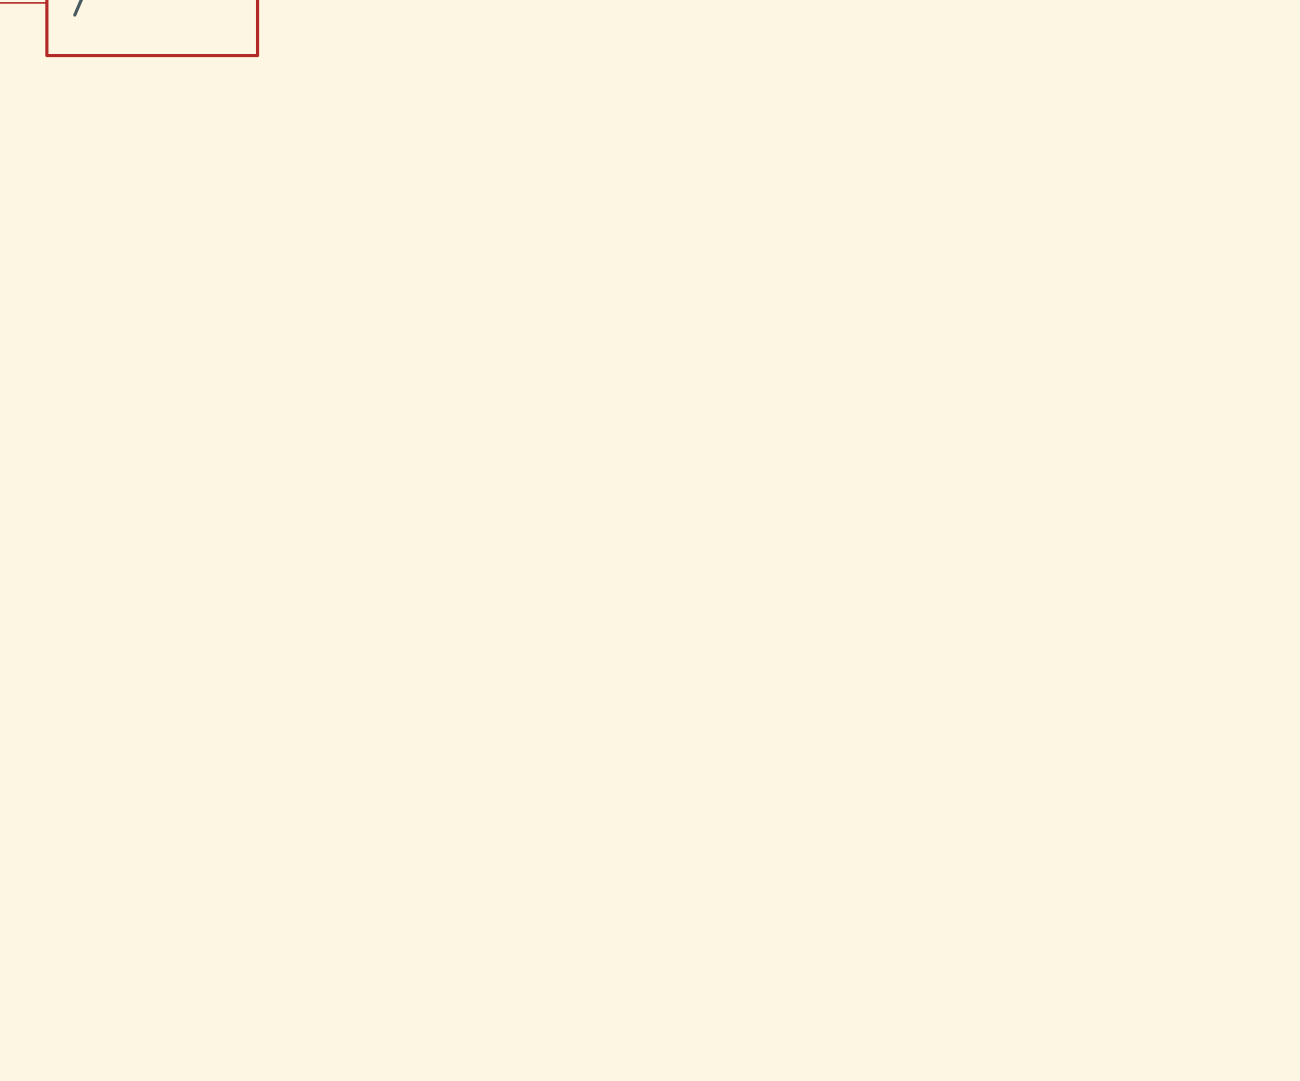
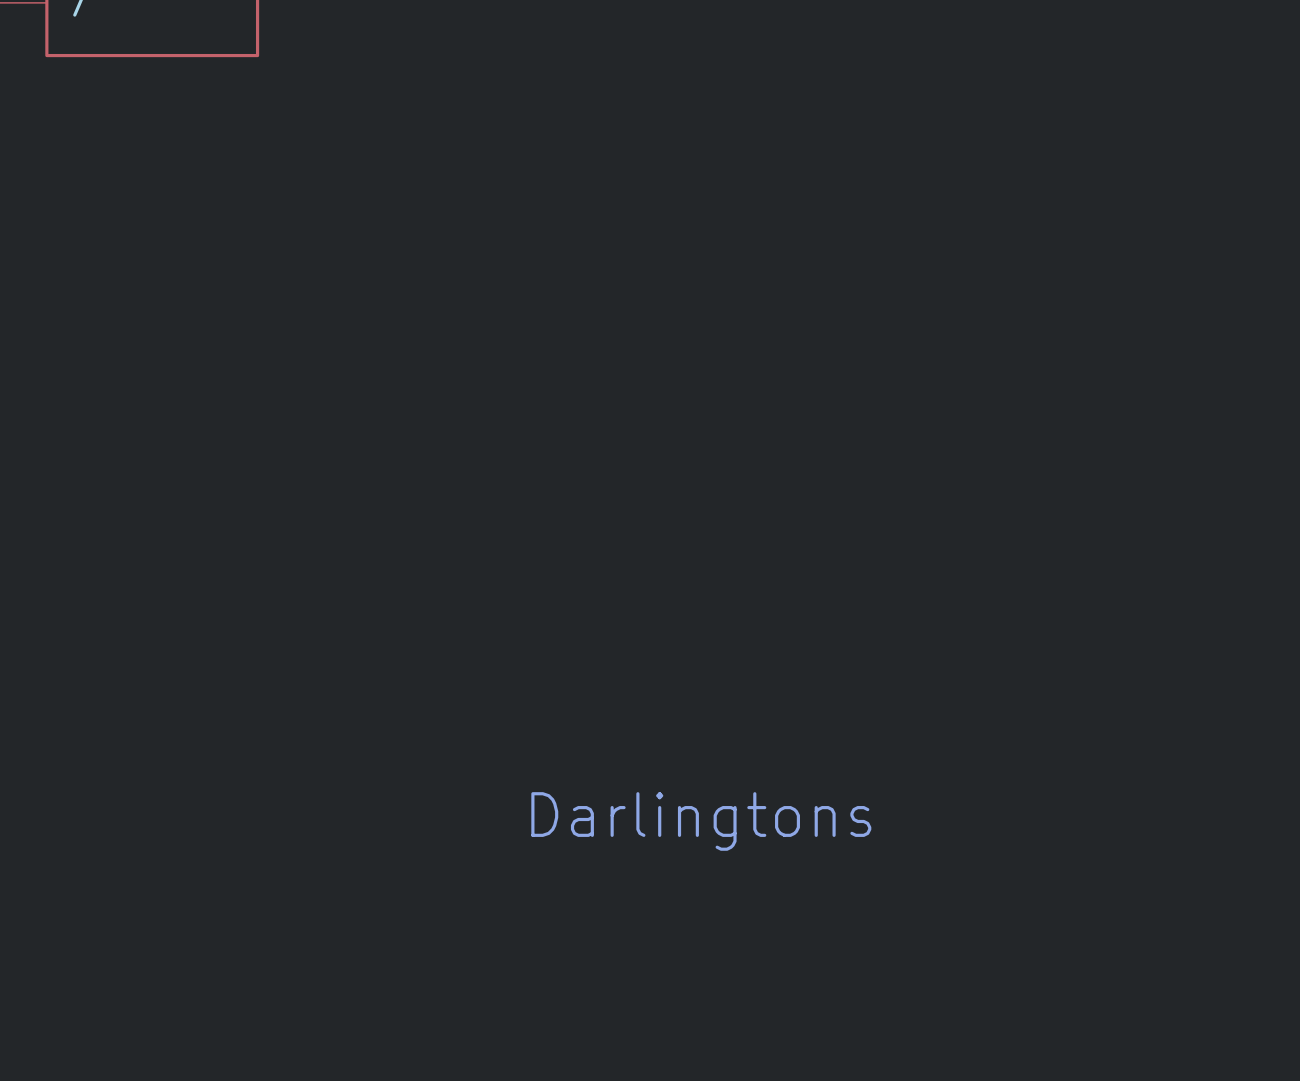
text: none -> Darlingtons (701, 821)

